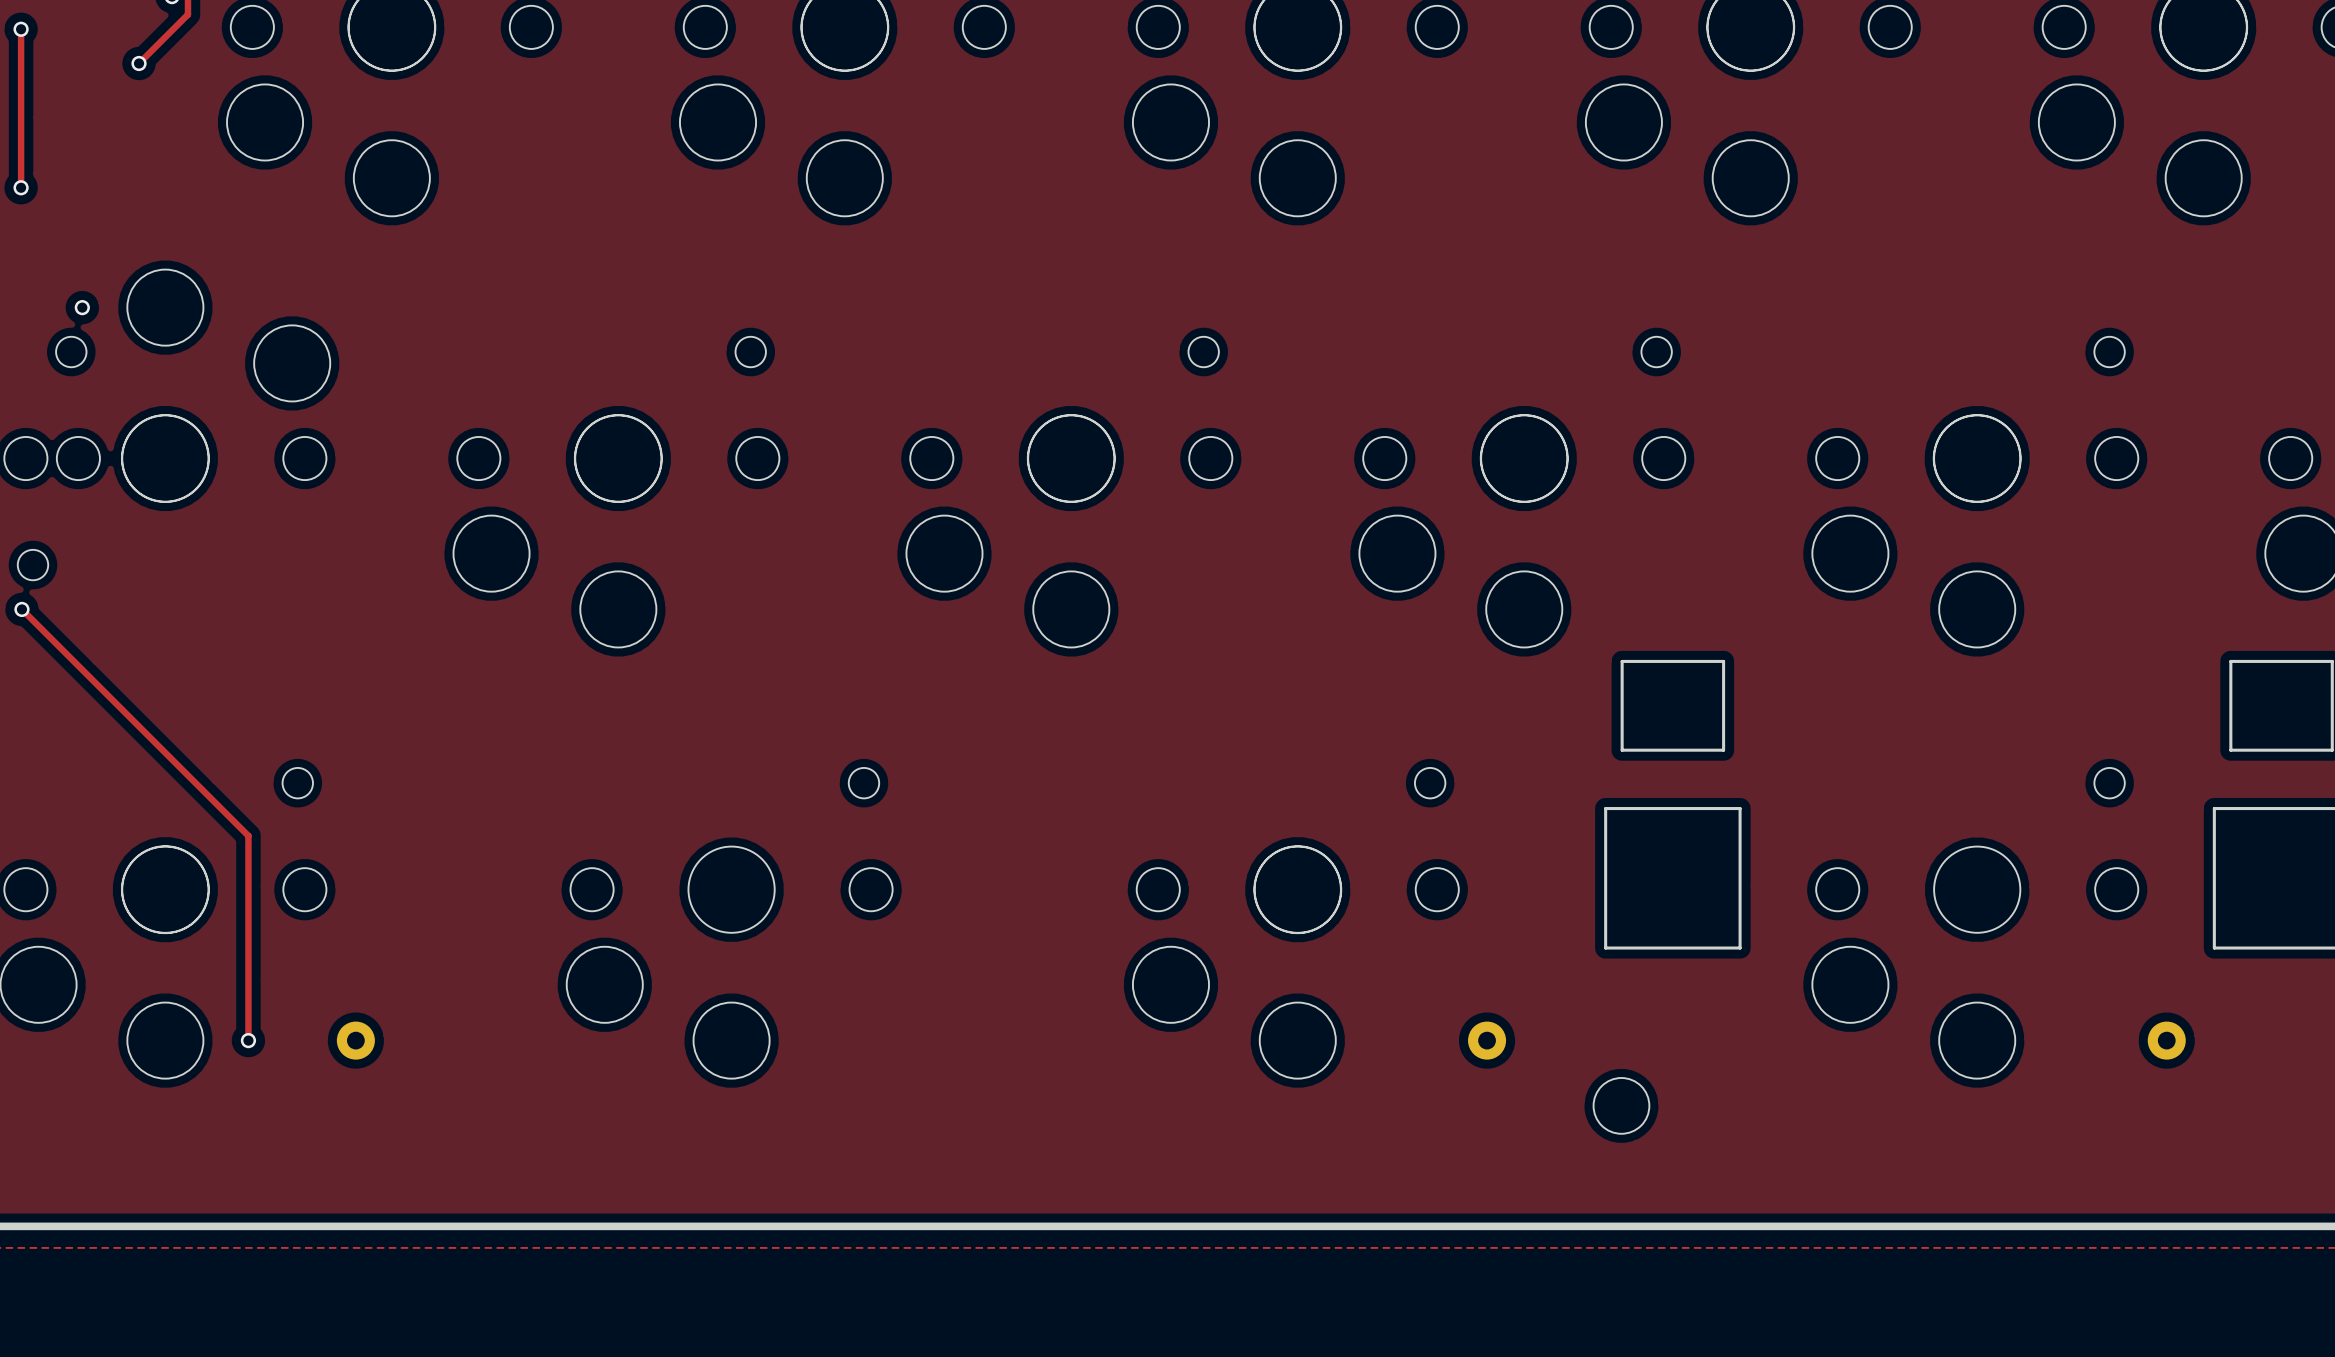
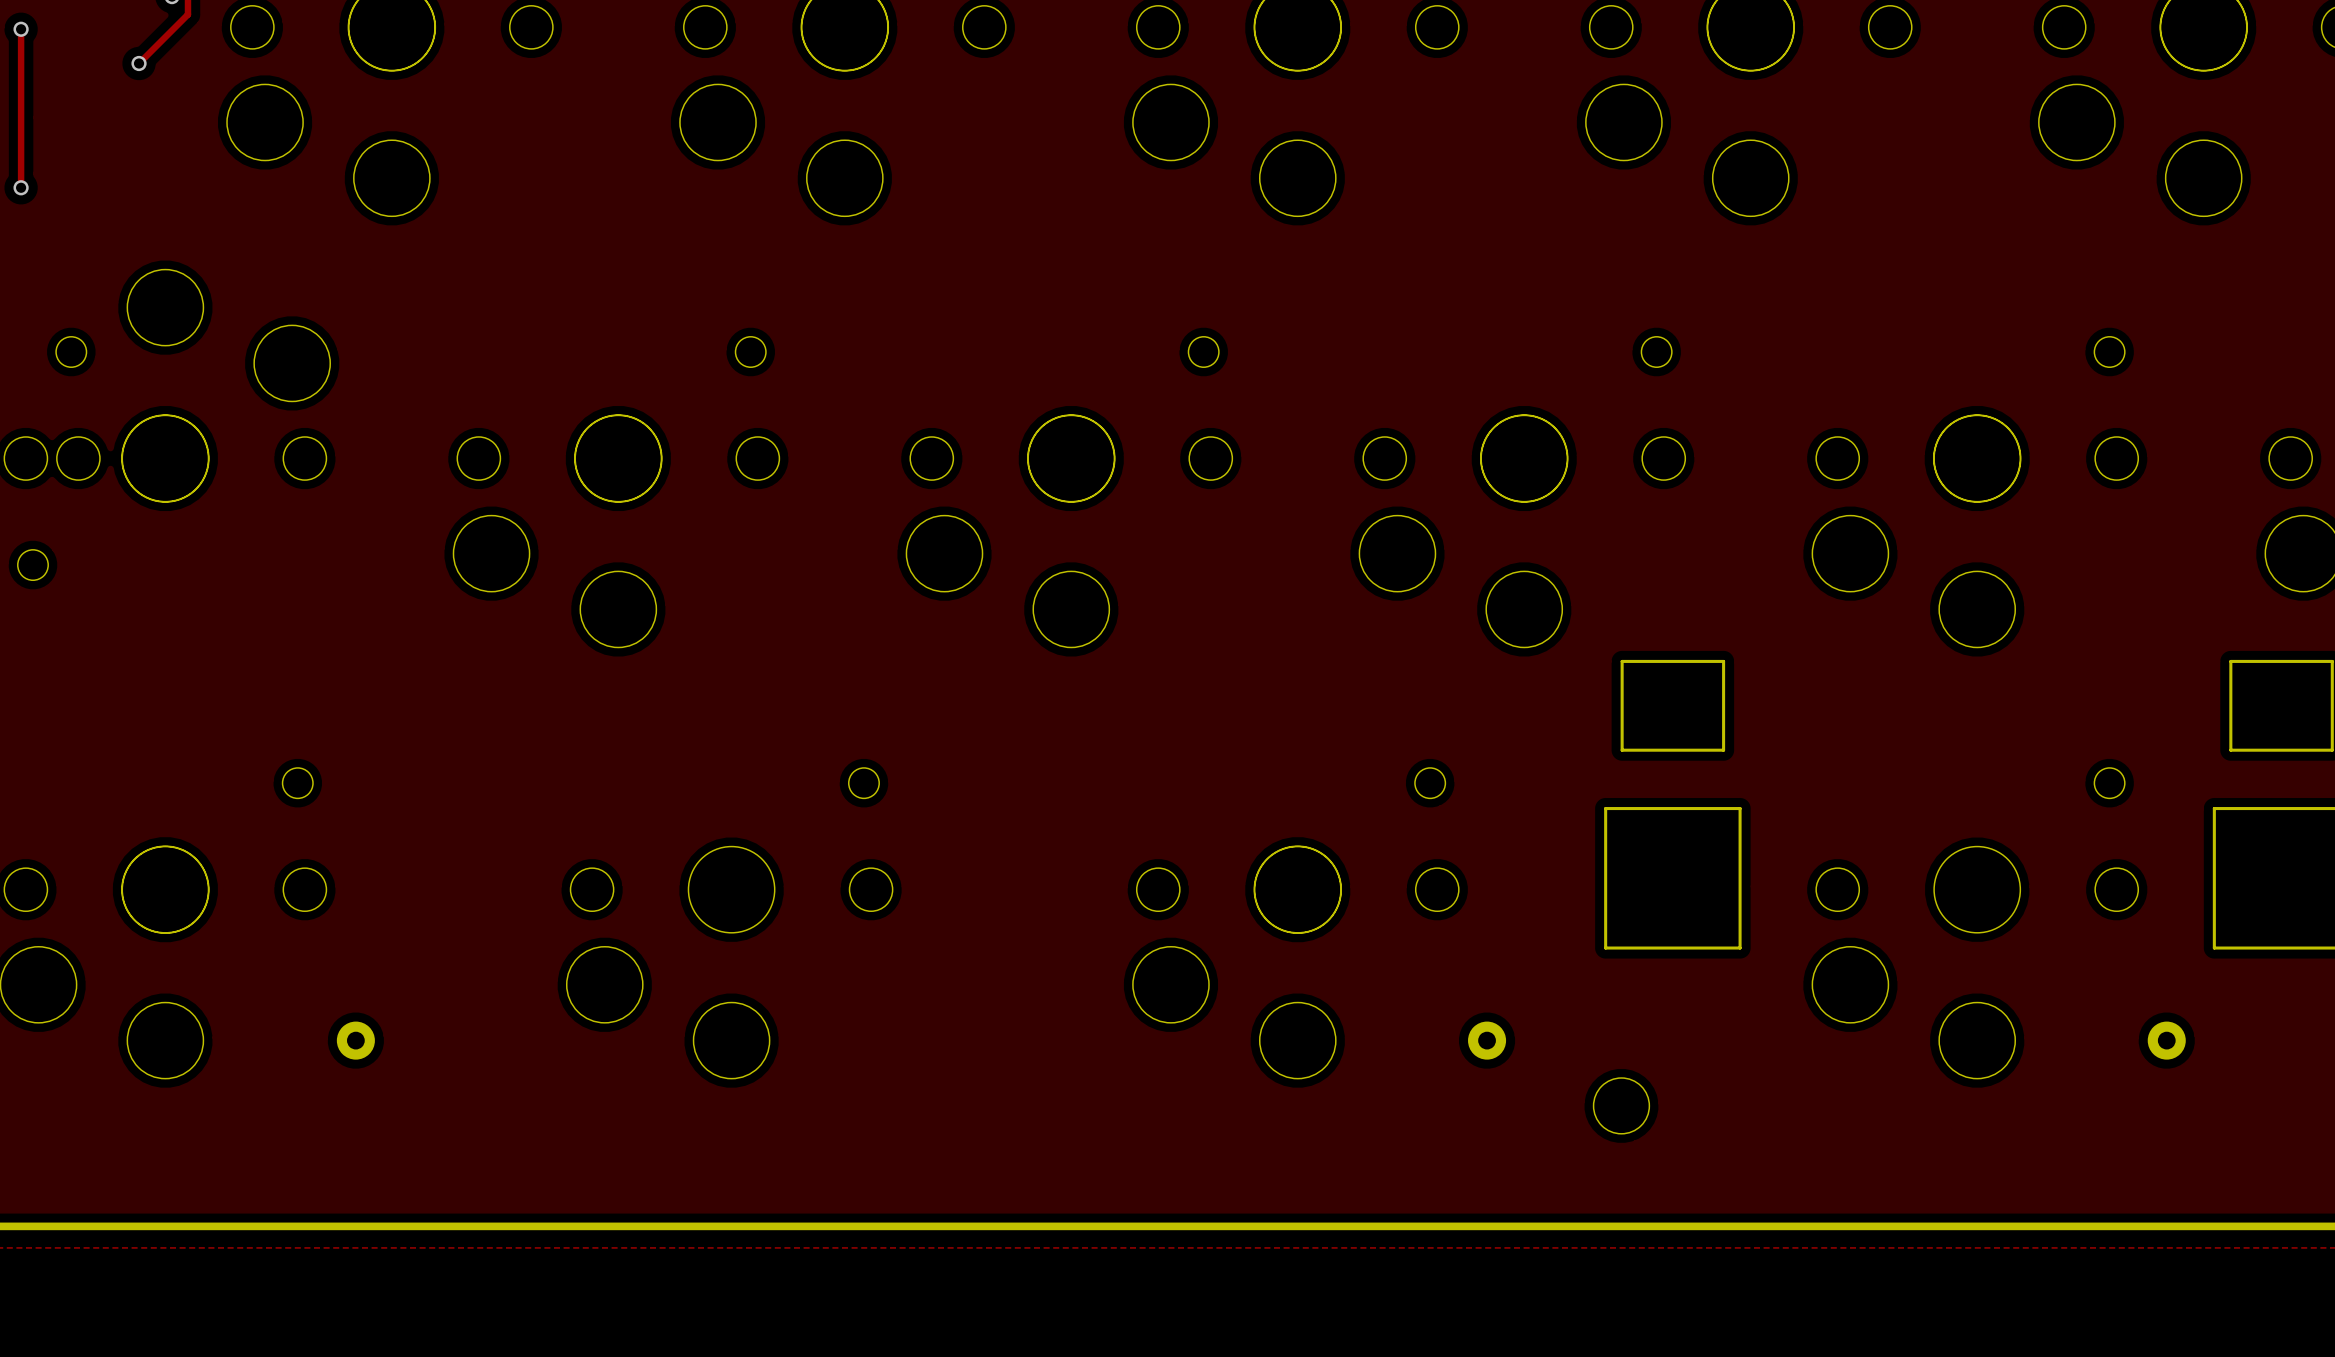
via: (82, 307) -> none
track: (21, 609) (248, 835) (248, 1040) -> none
via: (21, 609) -> none
via: (248, 1040) -> none

